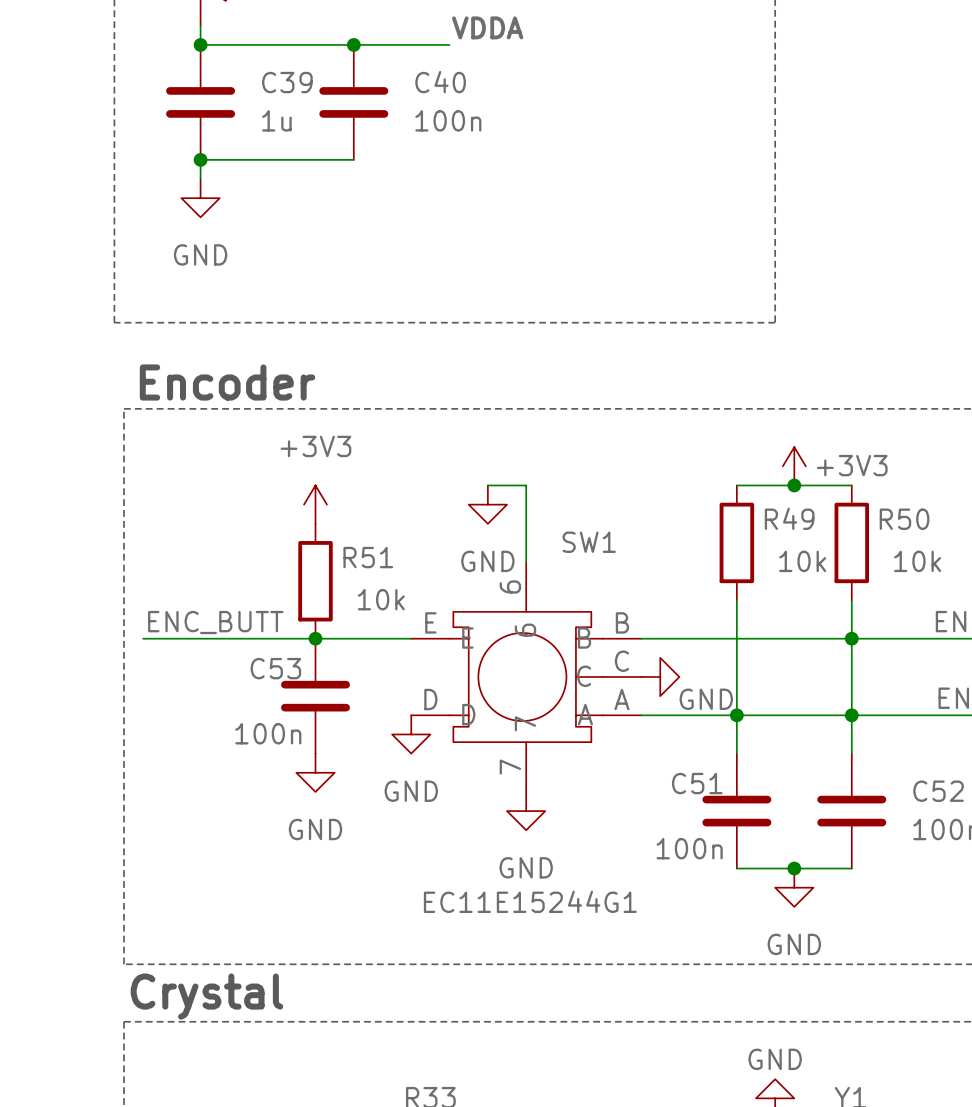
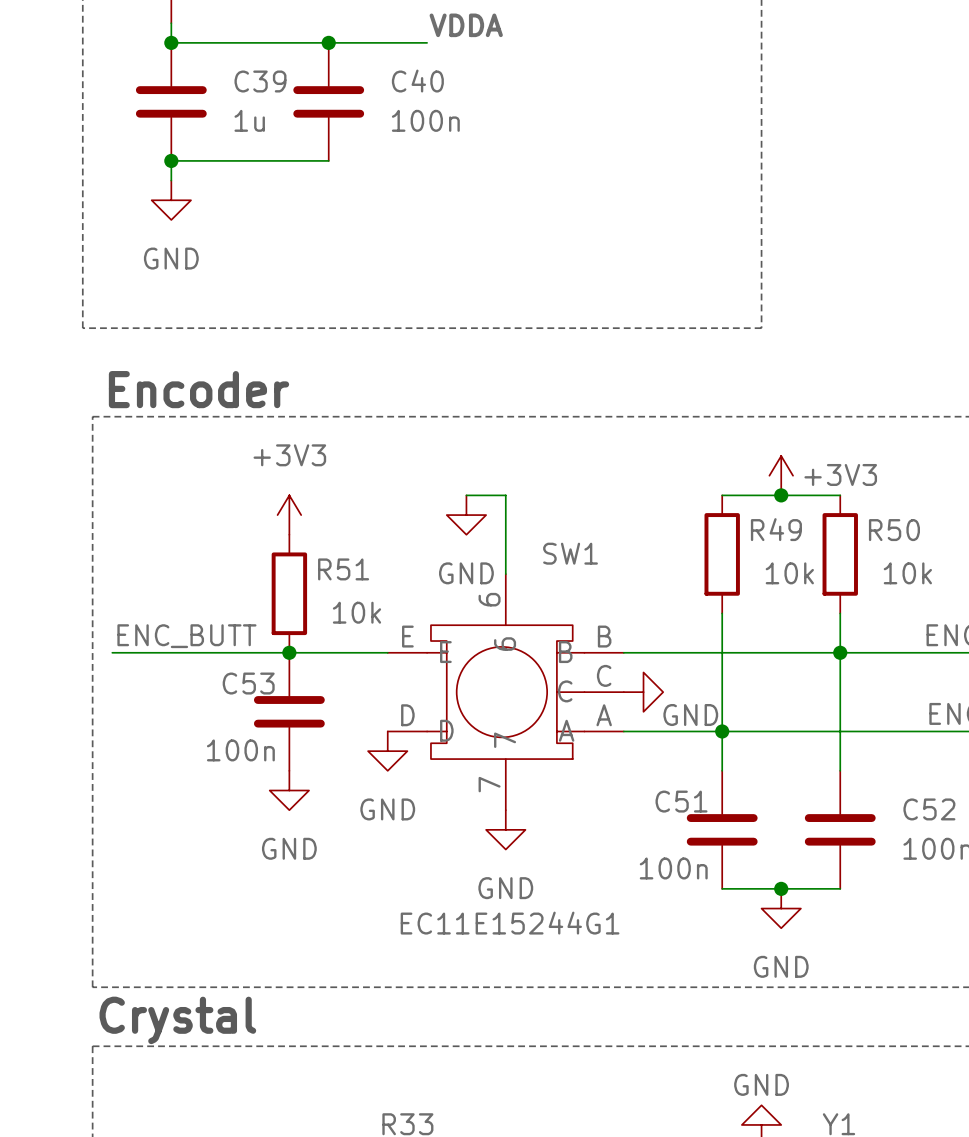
junction: (851, 715) -> none

